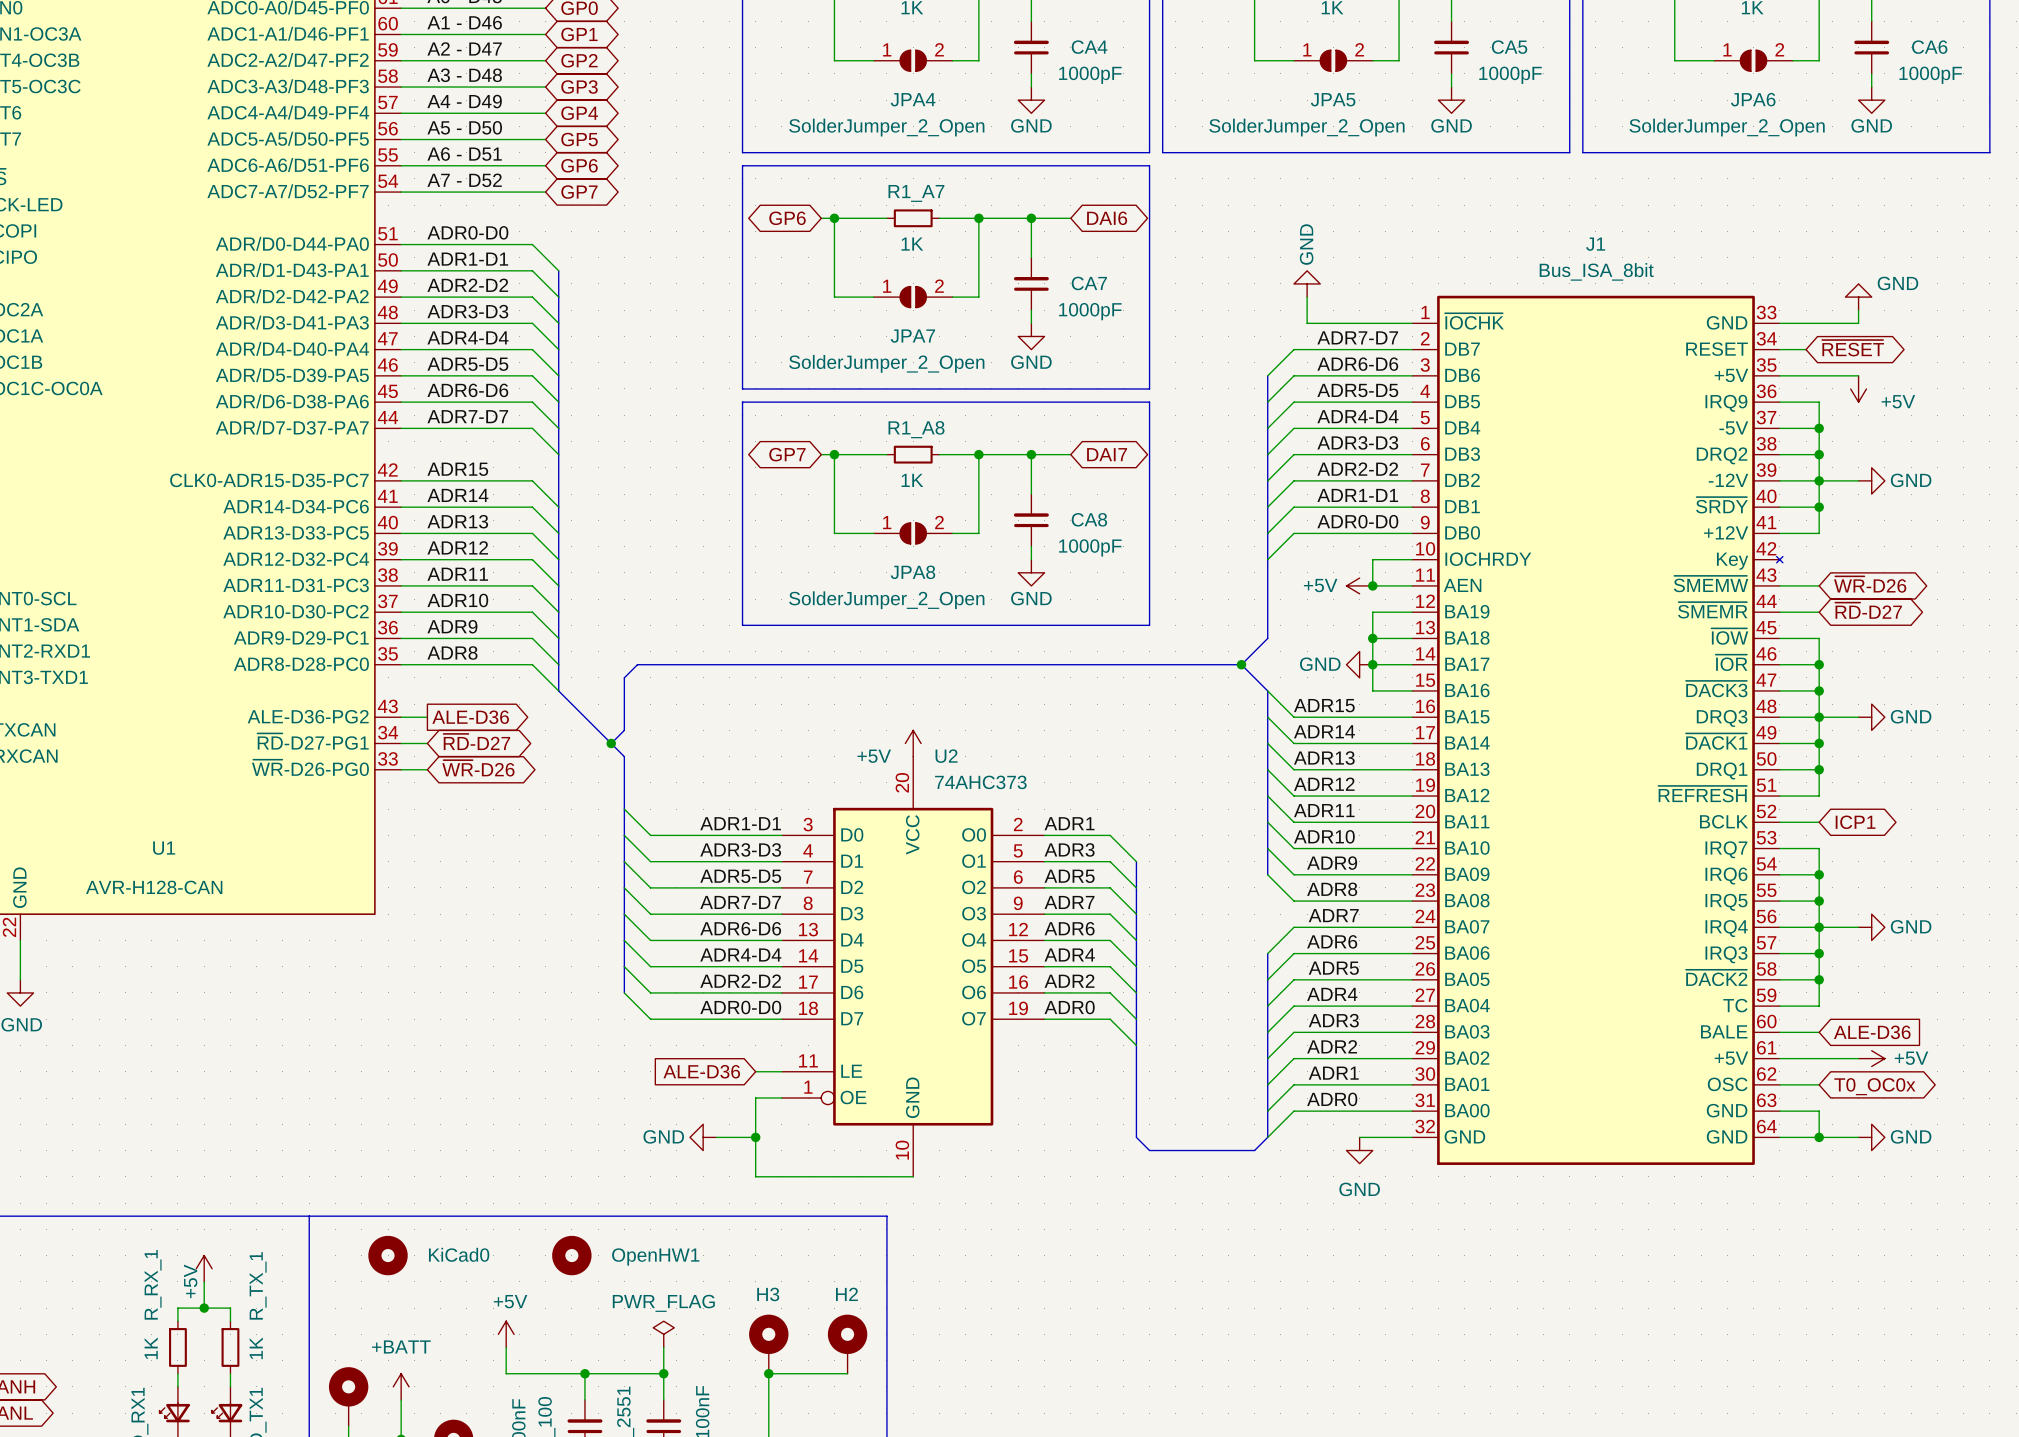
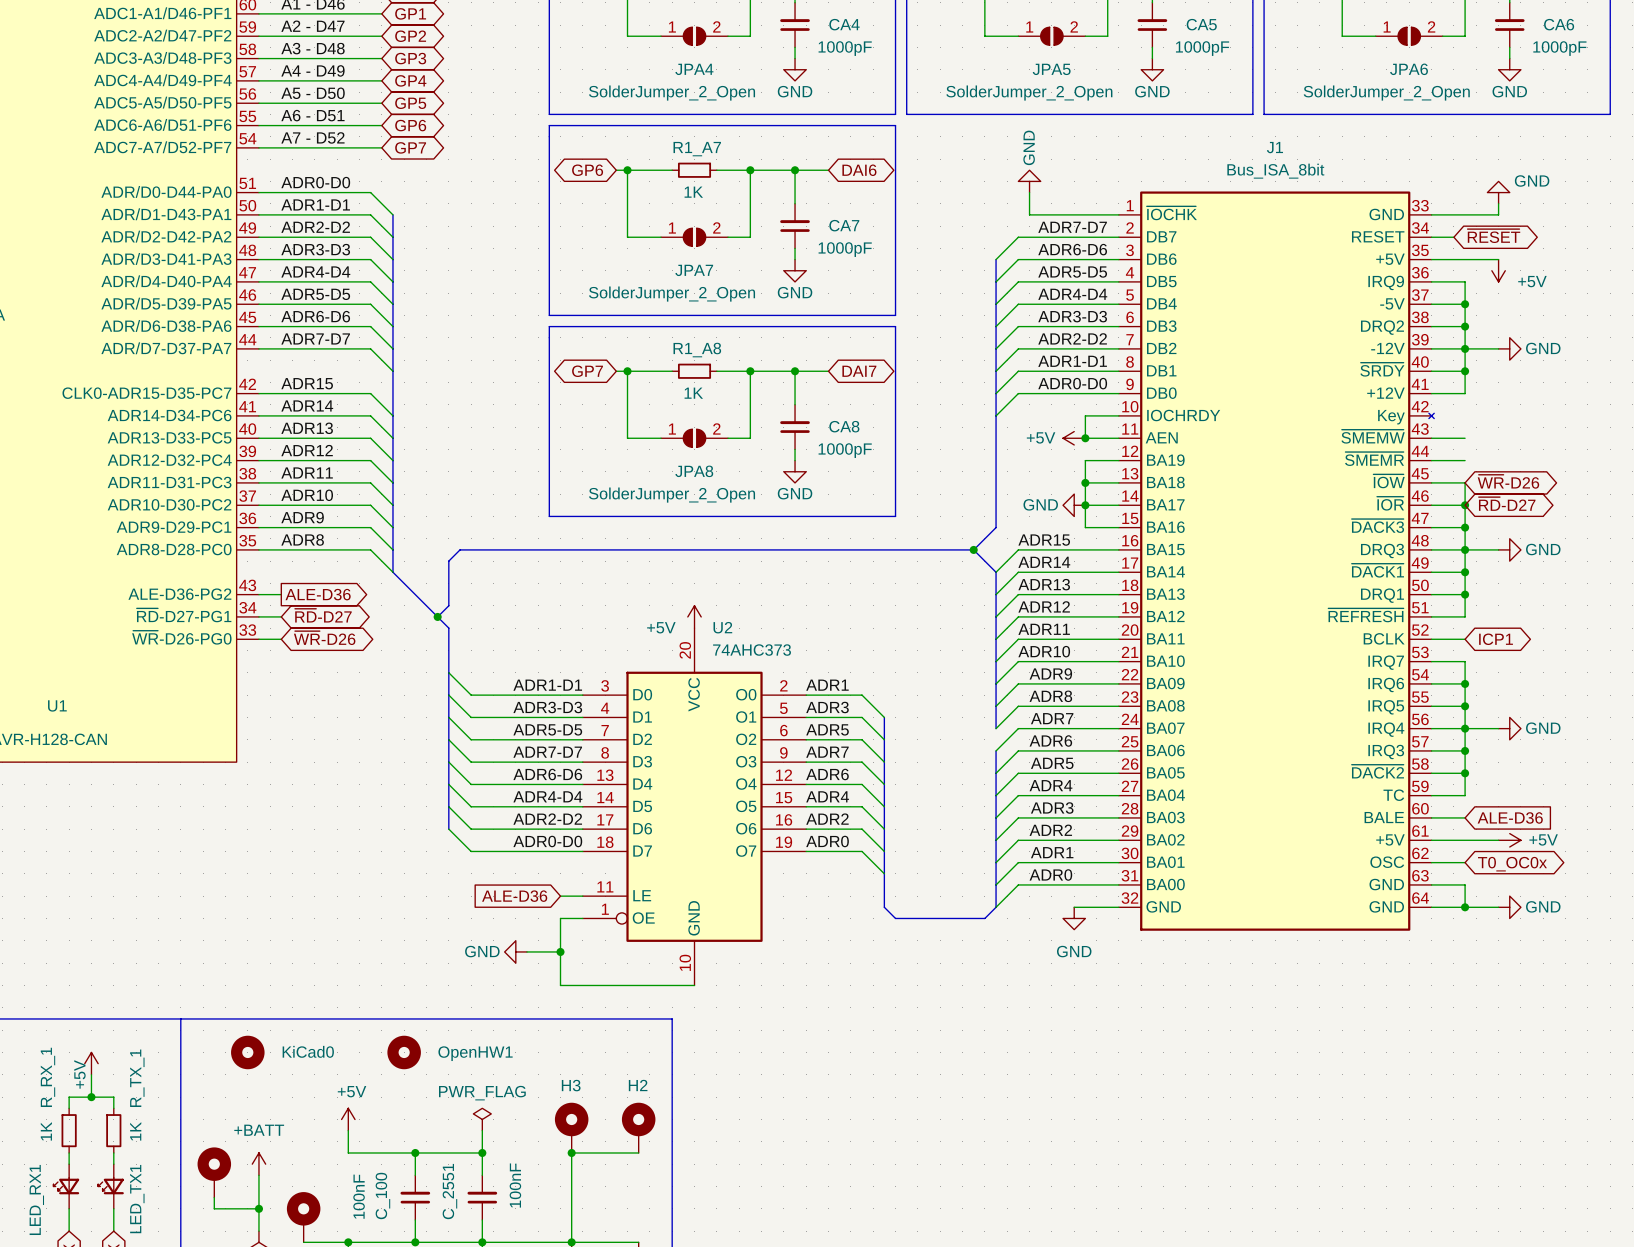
wire: none -> (1029, 192) (1029, 214) (1118, 214)
wire: none -> (1498, 203) (1498, 214) (1431, 214)
power symbol position: GND (1307, 283) -> GND (1029, 181)
label: none -> ADR7-D7 (1072, 227)
wire: (1307, 297) (1307, 323) -> (996, 281) (1018, 259) (1029, 259)
wire: none -> (1118, 237) (1018, 237) (996, 259)
wire: none -> (1431, 237) (1453, 237)
power symbol position: GND (1858, 297) -> GND (1498, 192)
wire: (1858, 310) (1858, 323) -> none
label: none -> ADR6-D6 (1072, 249)
bus: none -> (996, 259) (996, 304)
label: ADR7-D7 (1357, 337) -> ADR5-D5 (1072, 272)
global label position: ~{RESET} (1853, 348) -> ~{RESET} (1493, 236)
wire: none -> (1453, 281) (1465, 281) (1465, 326)
label: ADR6-D6 (1357, 364) -> ADR4-D4 (1072, 294)
wire: (1819, 375) (1858, 375) -> (1465, 348) (1498, 348)
junction: none -> (1465, 304)
power symbol position: +5V (1858, 388) -> +5V (1498, 270)
label: ADR5-D5 (1357, 390) -> ADR3-D3 (1072, 316)
junction: none -> (1465, 326)
label: ADR4-D4 (1357, 416) -> ADR2-D2 (1072, 338)
label: ADR3-D3 (1357, 442) -> ADR1-D1 (1072, 361)
label: ADR2-D2 (1357, 469) -> ADR0-D0 (1072, 383)
junction: (1819, 480) -> none
wire: (1858, 480) (1819, 480) (1819, 533) -> none
power symbol position: GND (1871, 480) -> GND (1509, 348)
label: ADR1-D1 (1357, 495) -> none
wire: (1372, 507) (1293, 507) (1267, 533) -> (1085, 415) (1085, 438)
wire: (1779, 507) (1819, 507) -> (1431, 460) (1465, 460)
junction: (1819, 507) -> none
label: ADR0-D0 (1357, 521) -> none
wire: (1372, 533) (1293, 533) (1267, 559) -> (1085, 549) (1018, 549) (996, 572)
junction: none -> (1085, 438)
power symbol position: +5V (1359, 585) -> +5V (1074, 438)
wire: none -> (1085, 482) (1085, 505)
wire: none -> (1465, 482) (1465, 527)
junction: none -> (1085, 505)
junction: none -> (1465, 505)
wire: (1372, 638) (1372, 690) -> (996, 594) (1018, 572) (1085, 572)
junction: (1372, 638) -> none
junction: none -> (1465, 527)
label: none -> ADR15 (1044, 540)
power symbol position: GND (1359, 664) -> GND (1074, 505)
junction: (1372, 664) -> none
label: none -> ADR14 (1044, 562)
wire: (1267, 690) (1293, 717) -> (996, 616) (1018, 594)
label: ADR15 (1324, 705) -> ADR13 (1044, 584)
wire: (1267, 717) (1293, 743) -> (996, 639) (1018, 616)
wire: (1819, 717) (1858, 717) -> (1465, 549) (1498, 549)
power symbol position: GND (1871, 717) -> GND (1509, 549)
J1 position: (1597, 730) -> (1276, 561)
label: ADR14 (1324, 731) -> ADR12 (1044, 606)
wire: (1267, 743) (1293, 769) -> (996, 661) (1018, 639)
wire: (1819, 743) (1819, 796) -> (1465, 706) (1465, 661)
junction: (1819, 743) -> none
label: ADR13 (1324, 758) -> ADR11 (1044, 629)
wire: (1267, 769) (1293, 796) -> (996, 683) (1018, 661)
junction: (1819, 769) -> none
label: ADR12 (1324, 784) -> ADR10 (1044, 651)
wire: (1267, 796) (1293, 822) -> (996, 706) (1018, 683)
label: ADR11 (1324, 810) -> none
wire: (1267, 822) (1293, 848) -> (996, 728) (1018, 706)
junction: none -> (1465, 683)
global label position: ICP1 (1855, 822) -> ICP1 (1496, 639)
label: ADR10 (1324, 836) -> ADR8 (1050, 696)
wire: (1267, 848) (1293, 874) -> (996, 750) (1018, 728)
junction: none -> (1465, 706)
label position: ADR9 (1332, 863) -> ADR9 (1050, 673)
label: none -> ADR7 (1052, 718)
wire: (1267, 874) (1293, 901) -> (996, 773) (1018, 750)
label: ADR8 (1332, 889) -> ADR6 (1050, 740)
bus: none -> (996, 750) (996, 795)
label: ADR7 (1333, 915) -> ADR5 (1052, 763)
wire: (1819, 927) (1858, 927) -> (1465, 728) (1498, 728)
power symbol position: GND (1871, 927) -> GND (1509, 728)
label: ADR6 (1332, 941) -> ADR4 (1050, 785)
wire: (1819, 953) (1819, 1006) -> (1498, 840) (1465, 840)
junction: (1819, 953) -> none
label: ADR5 (1333, 968) -> ADR3 (1052, 807)
junction: (1819, 979) -> none
global label: none -> ALE-D36 (1510, 817)
label: ADR4 (1332, 994) -> ADR2 (1050, 830)
label: ADR3 (1333, 1020) -> ADR1 (1052, 852)
global label shape: input (1872, 1032) -> bidirectional (1512, 864)
global label: ALE-D36 (1872, 1032) -> T0_OC0x (1512, 864)
label: ADR2 (1332, 1046) -> ADR0 (1050, 875)
wire: (1819, 1058) (1858, 1058) -> (1465, 884) (1465, 907) (1498, 907)
power symbol position: +5V (1871, 1058) -> +5V (1509, 840)
label: ADR1 (1333, 1073) -> none
bus: (1136, 1084) (1136, 1137) (1149, 1150) (1254, 1150) (1267, 1137) (1267, 1084) -> (884, 907) (895, 918) (984, 918) (996, 907)
wire: (1359, 1084) (1293, 1084) (1267, 1111) -> none
junction: none -> (1465, 907)
global label: T0_OC0x (1874, 1086) -> none
label: ADR0 (1332, 1099) -> none
wire: (1412, 1111) (1293, 1111) (1267, 1137) -> none
wire: (1779, 1111) (1819, 1111) (1819, 1137) -> none
wire: (1359, 1137) (1412, 1137) -> none
wire: (1779, 1137) (1858, 1137) -> none
junction: (1819, 1137) -> none
power symbol position: GND (1871, 1137) -> GND (1509, 907)
power symbol position: GND (1359, 1150) -> GND (1074, 918)

